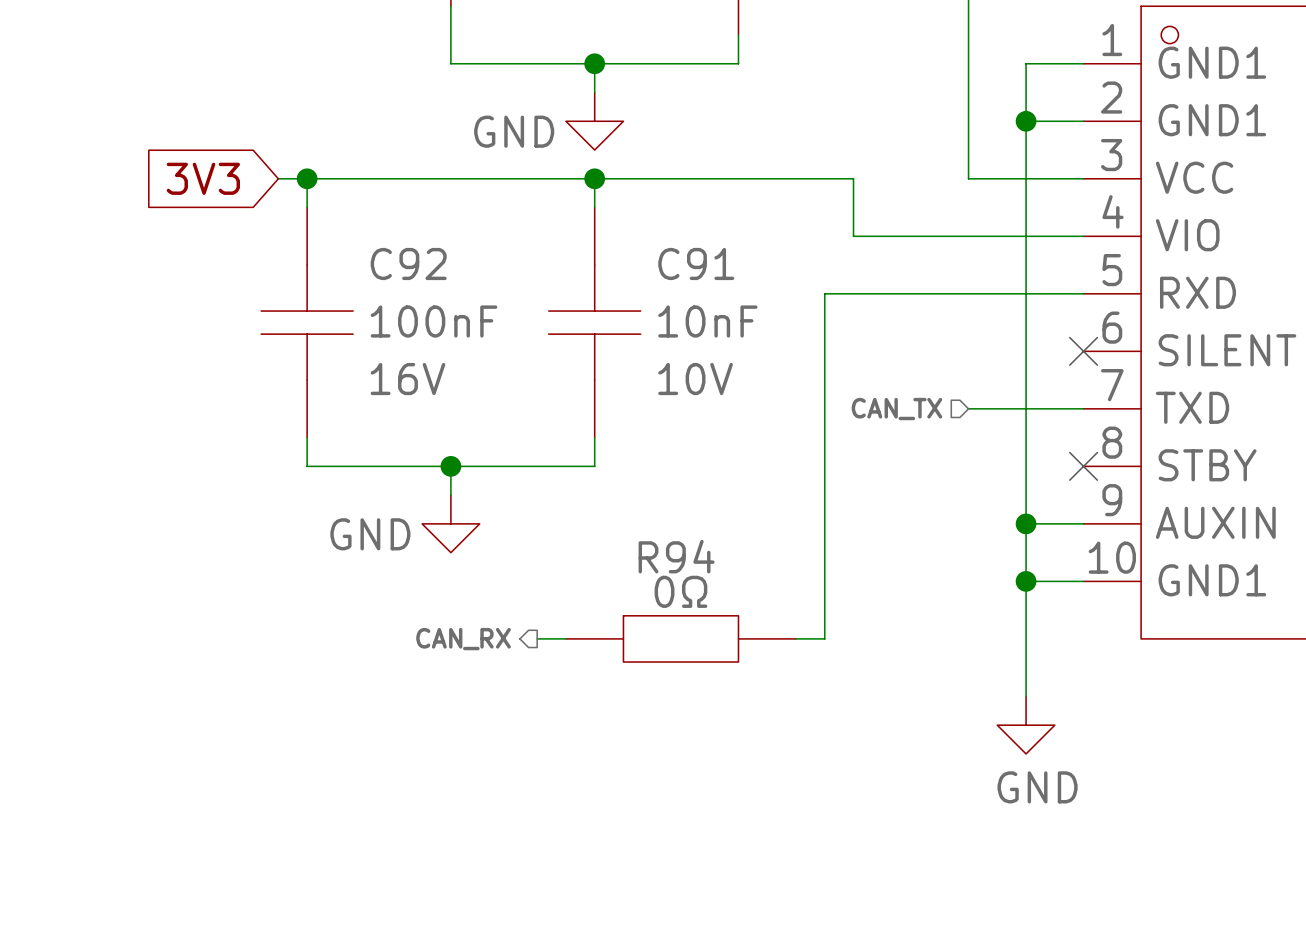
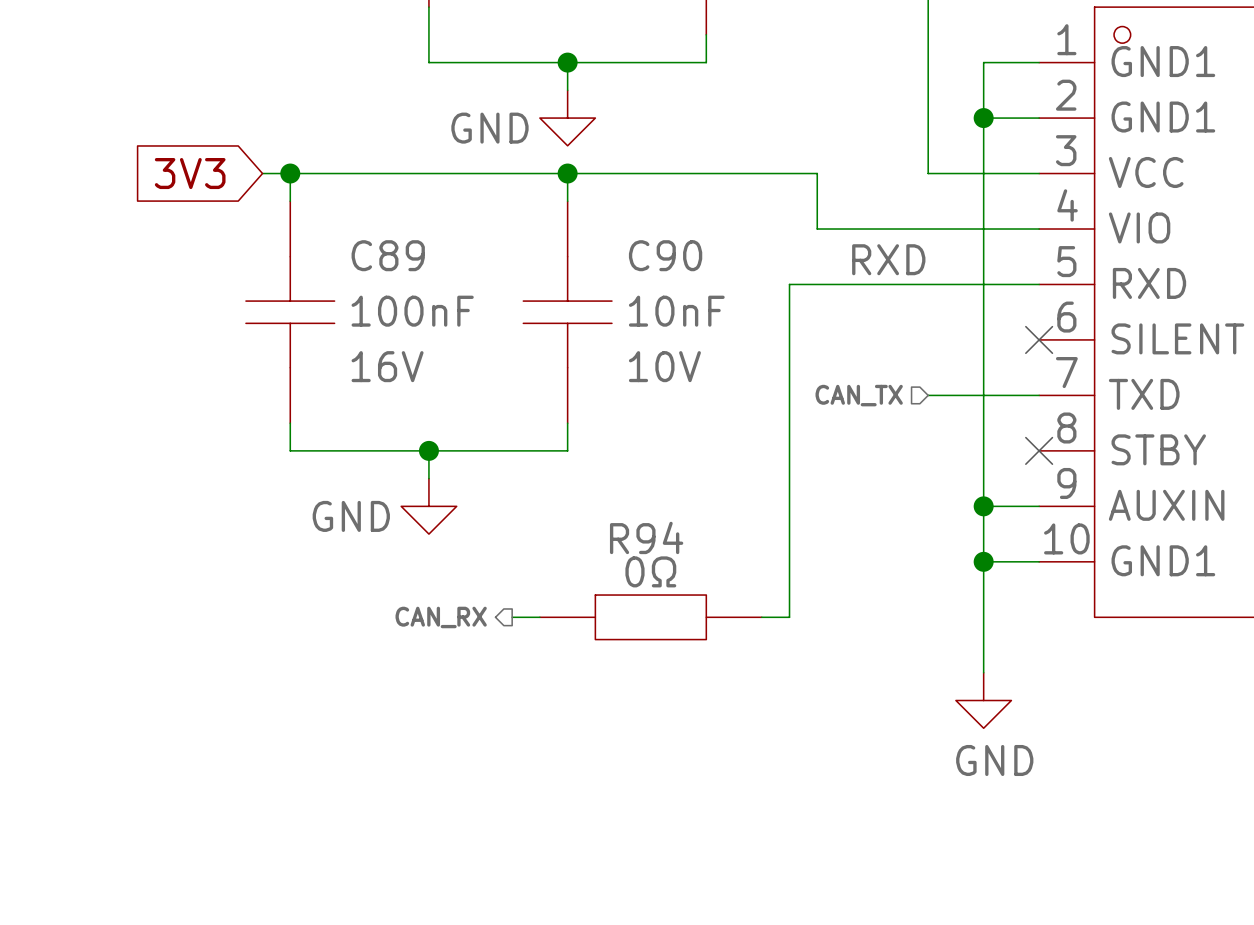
C92 name: C92 (408, 263) -> C89 (388, 255)
C91 name: C91 (696, 263) -> C90 (665, 255)
label: none -> RXD (888, 259)

